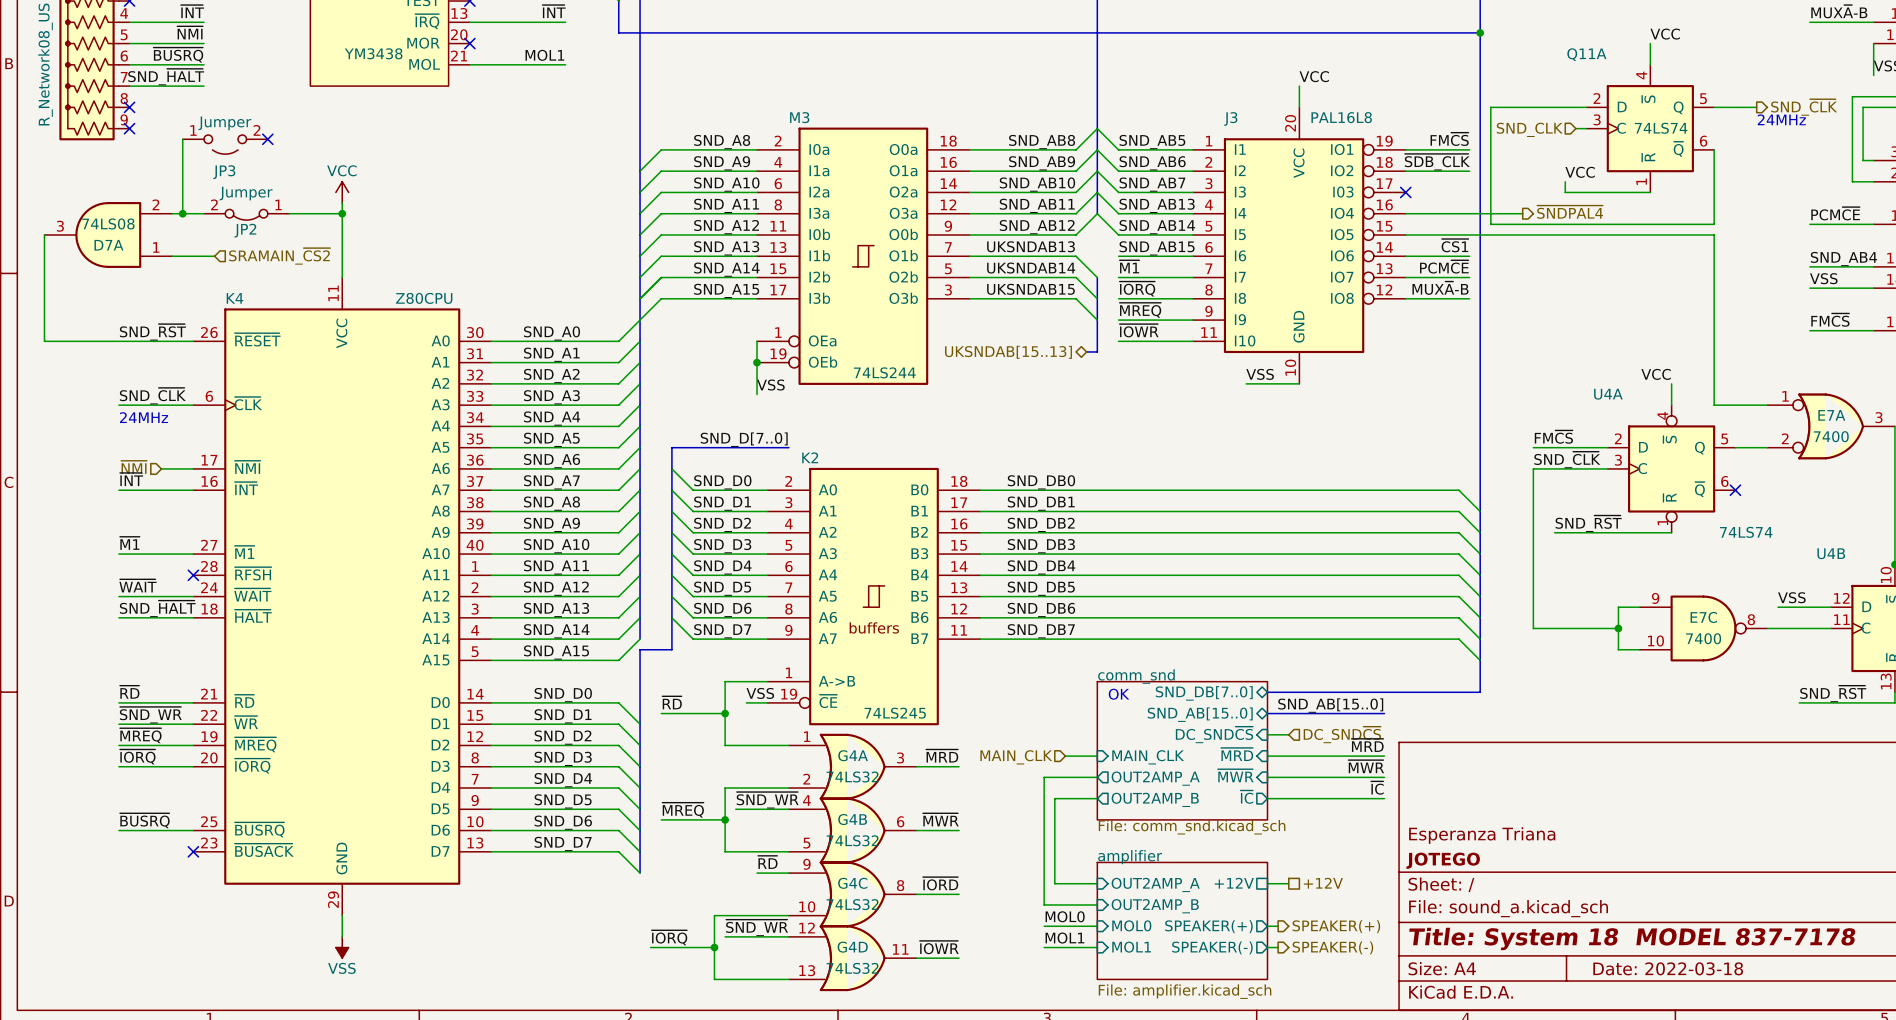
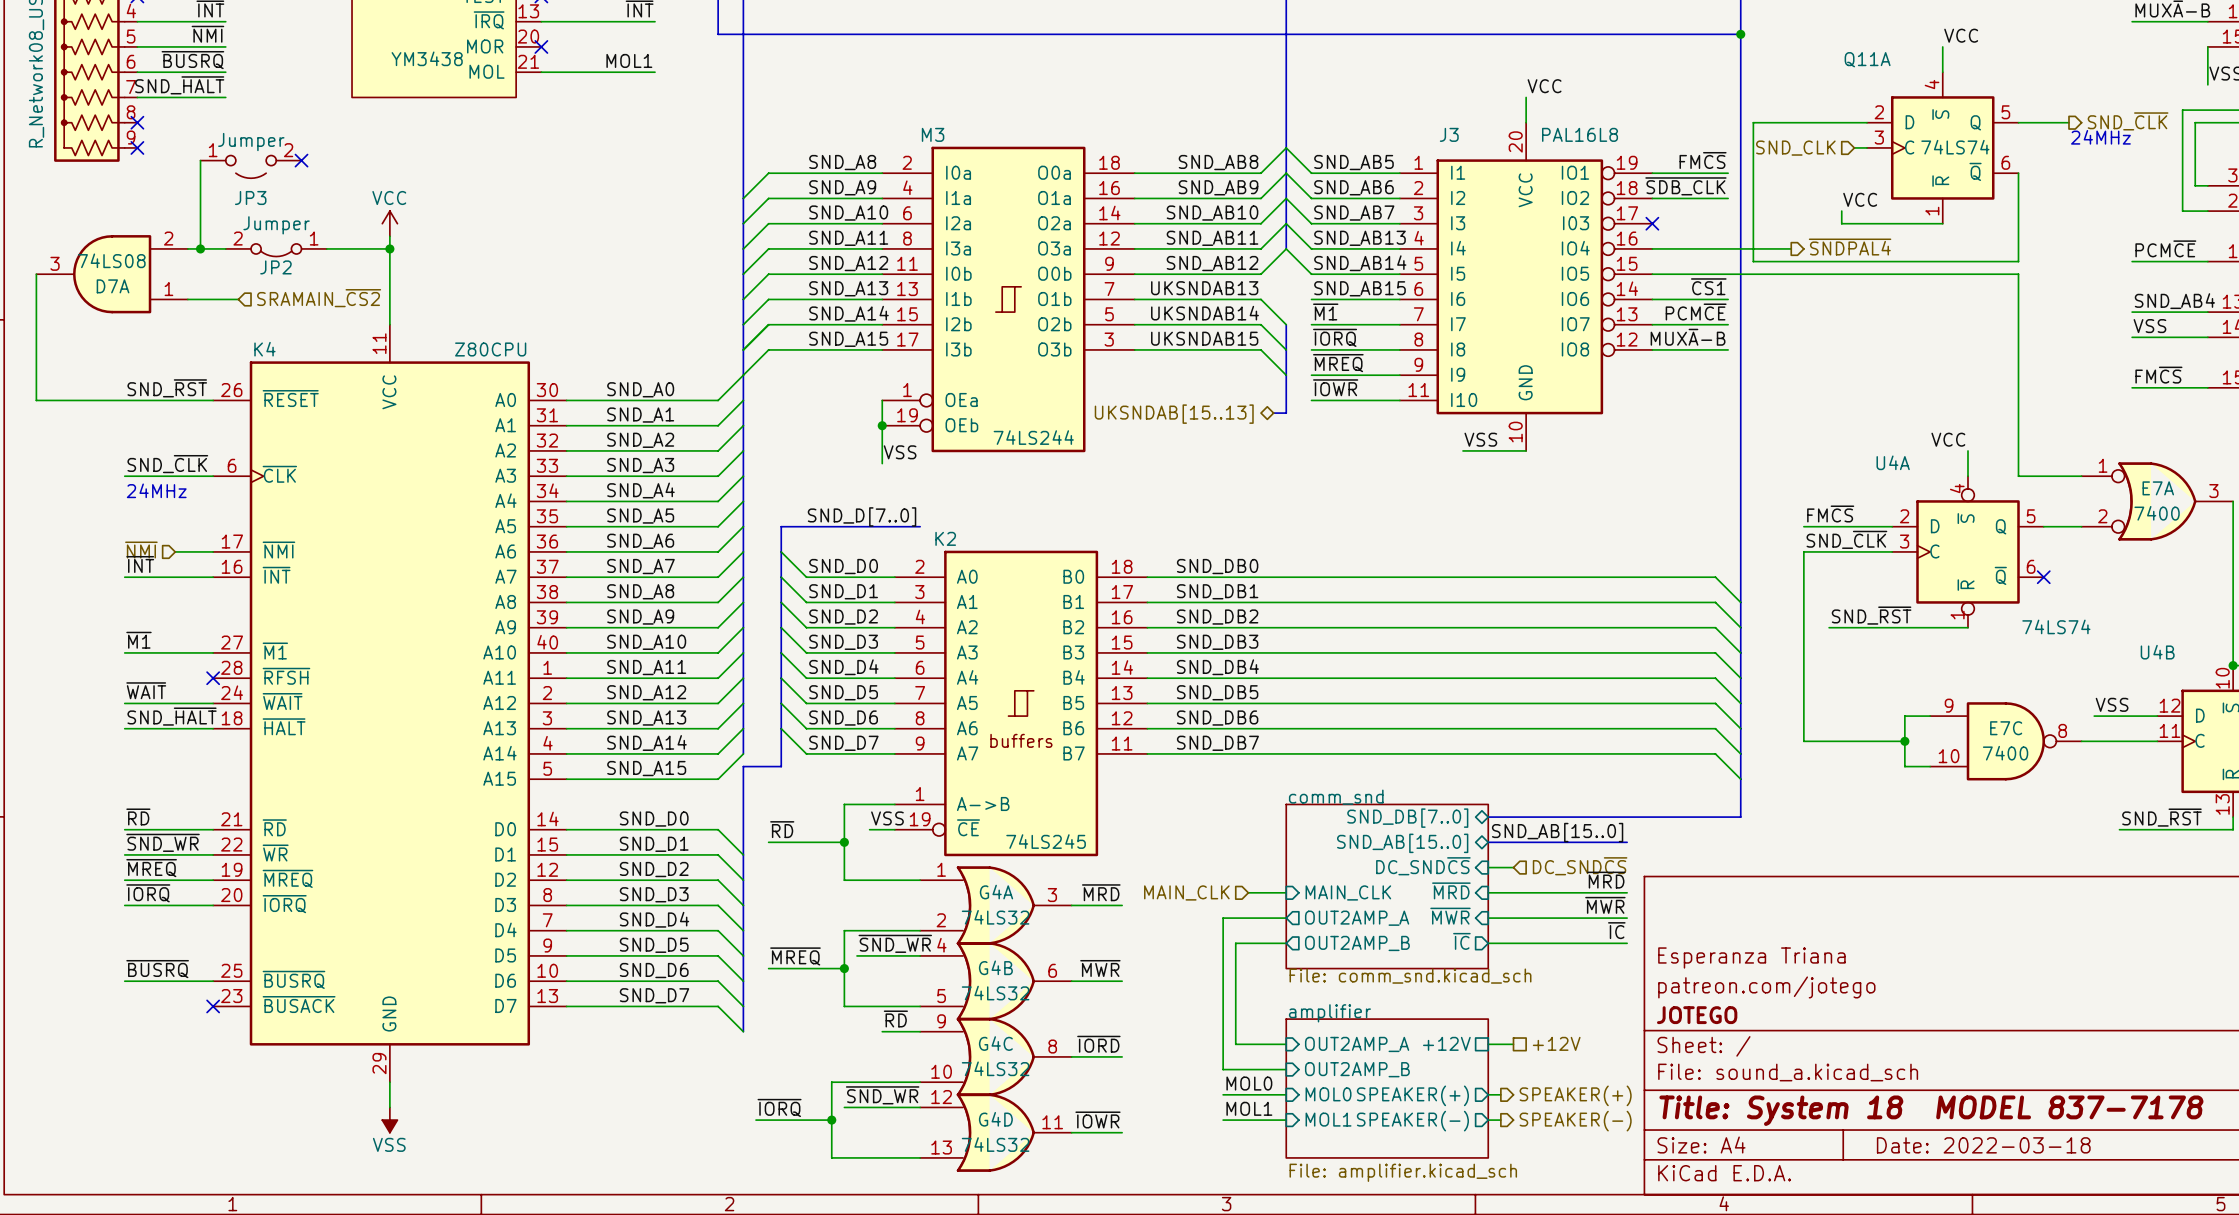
text: OK (1119, 694) -> none
title block: none -> Esperanza Triana (1751, 957)
title block: Esperanza Triana (1482, 835) -> patreon.com/jotego (1766, 987)

